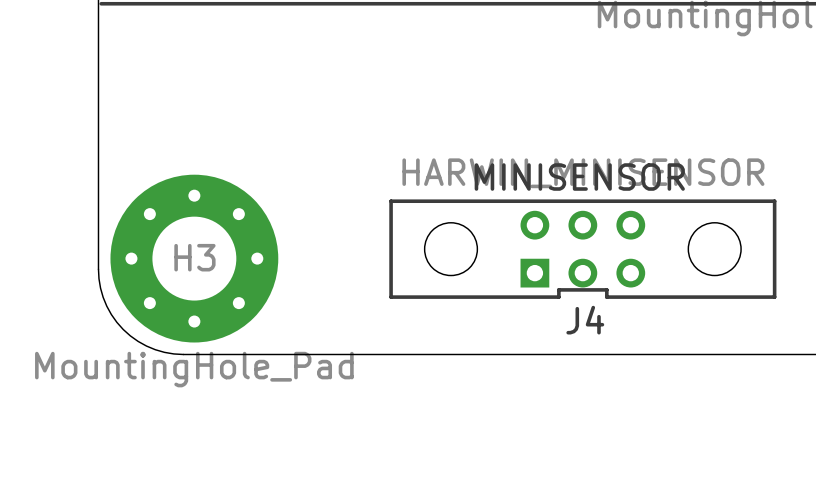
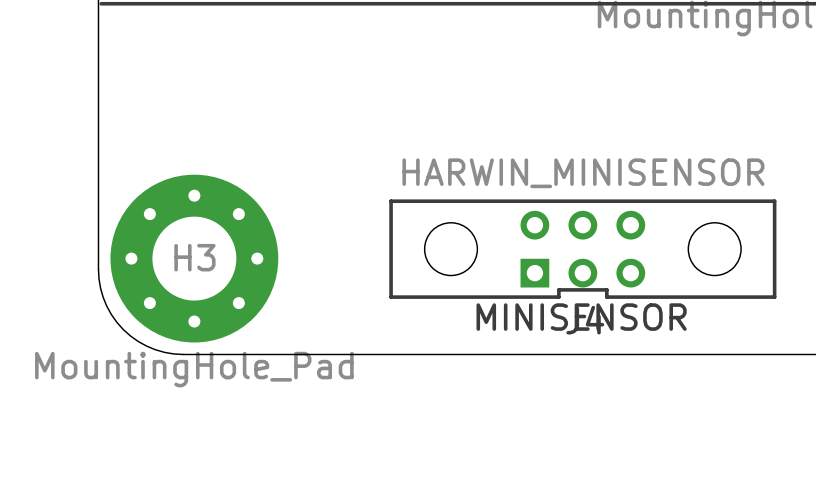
text position: MINISENSOR (579, 177) -> MINISENSOR (581, 317)

